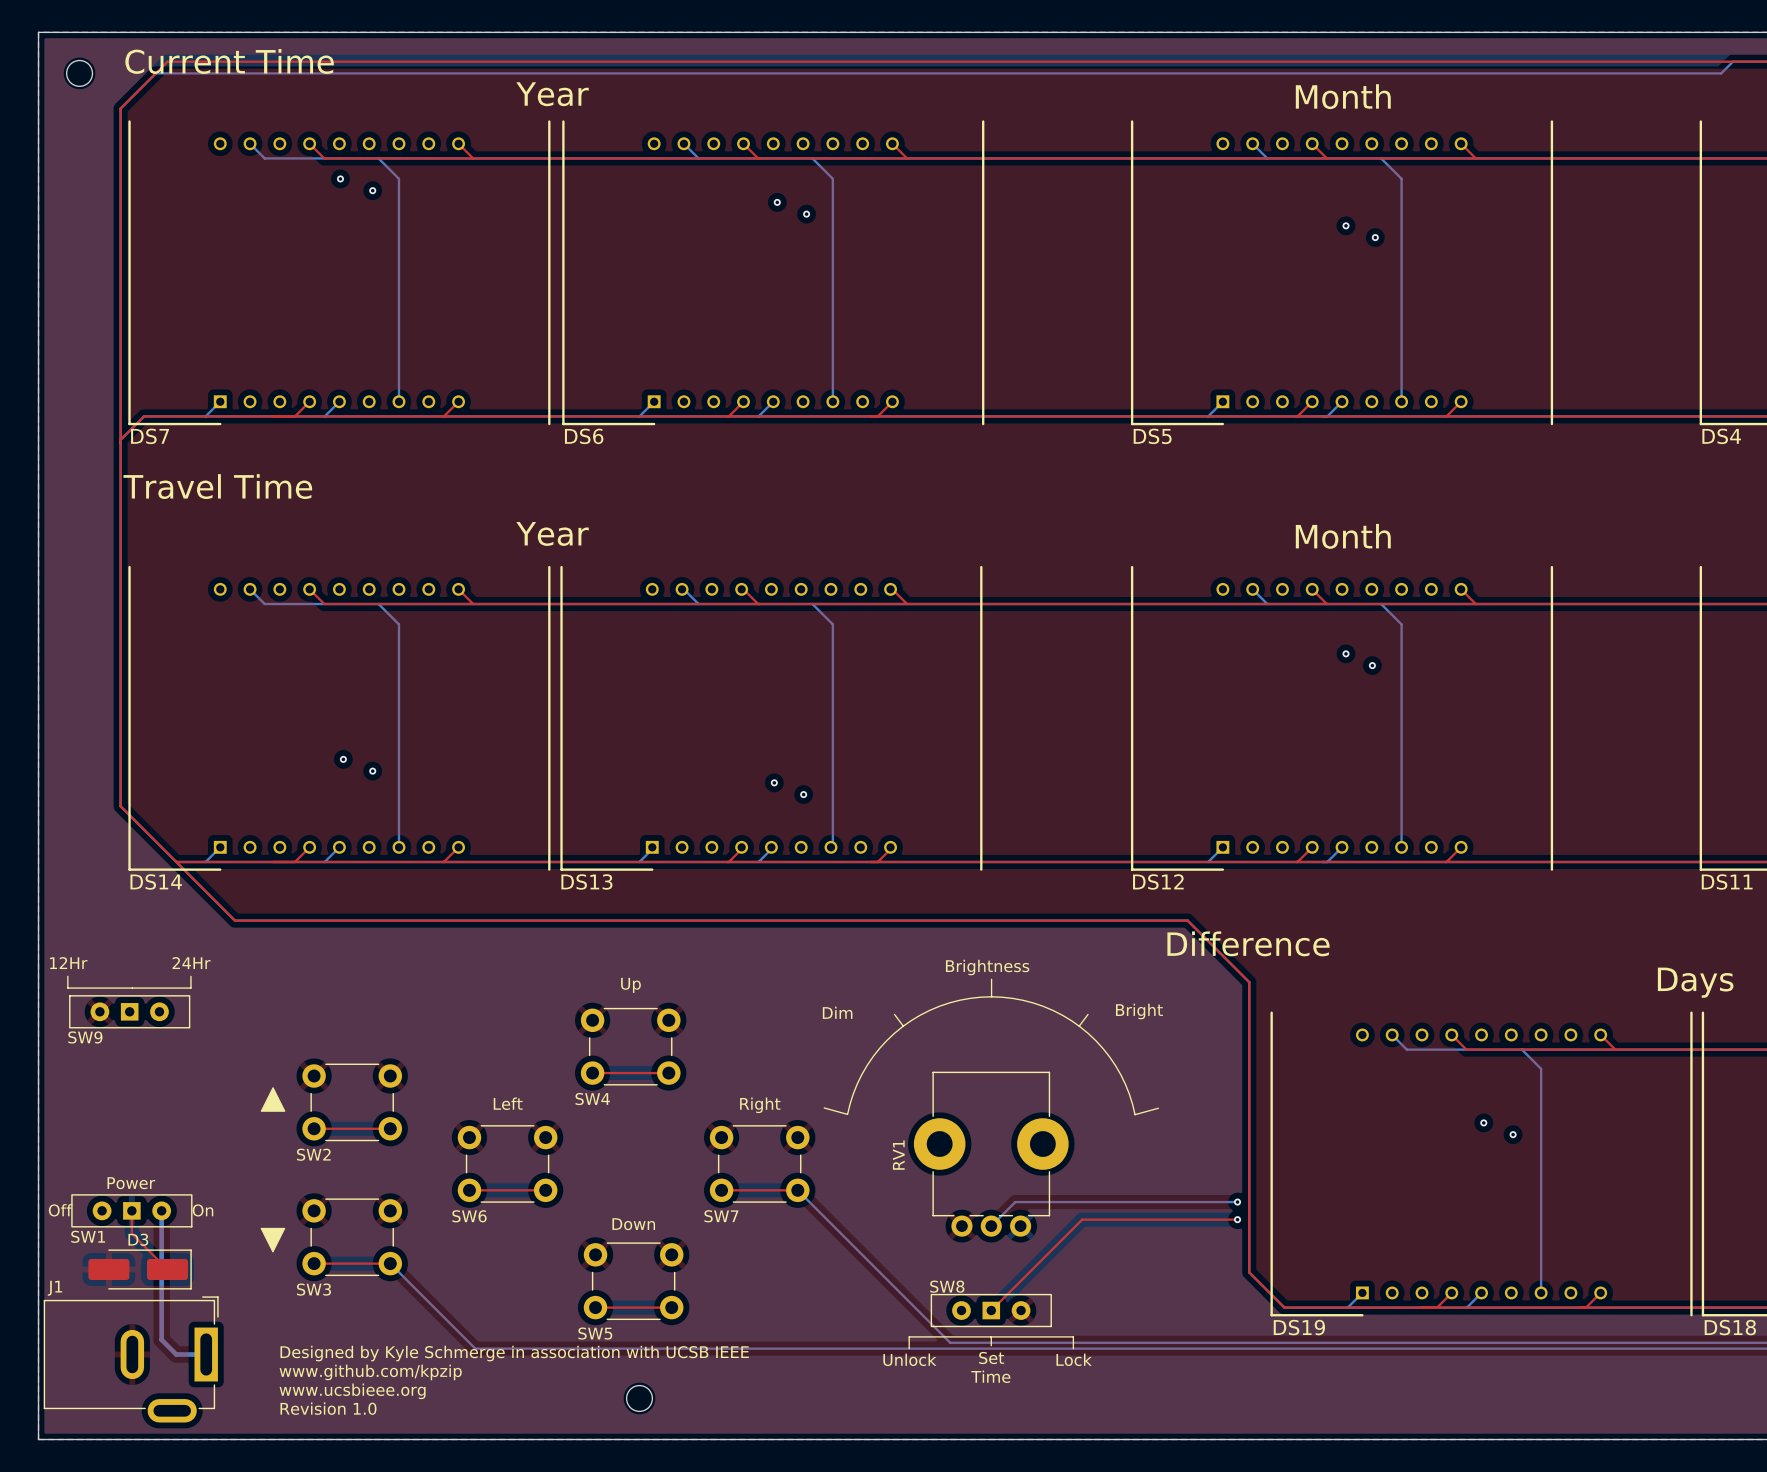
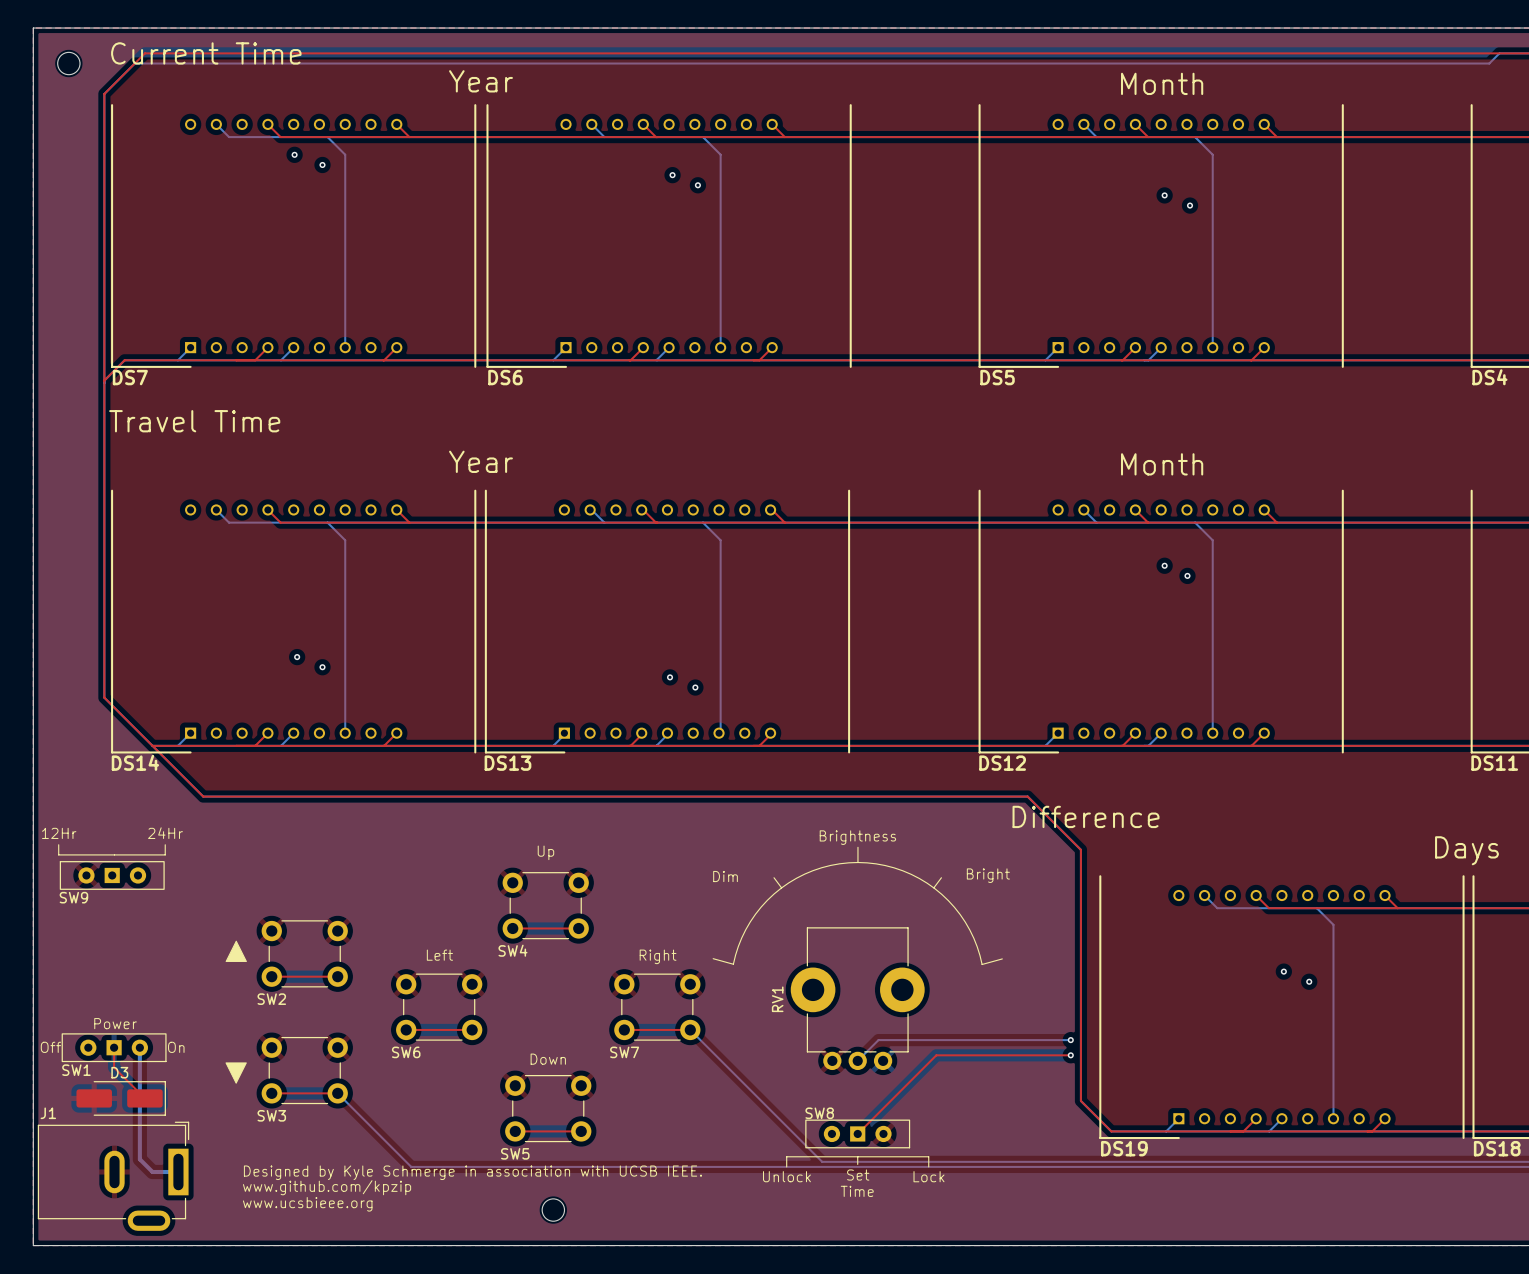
text: Designed by Kyle Schmerge in association with UCSB IEEE (514, 1353) -> Designed by Kyle Schmerge in association with UCSB IEEE. (472, 1172)
text: Revision 1.0 (328, 1408) -> none

